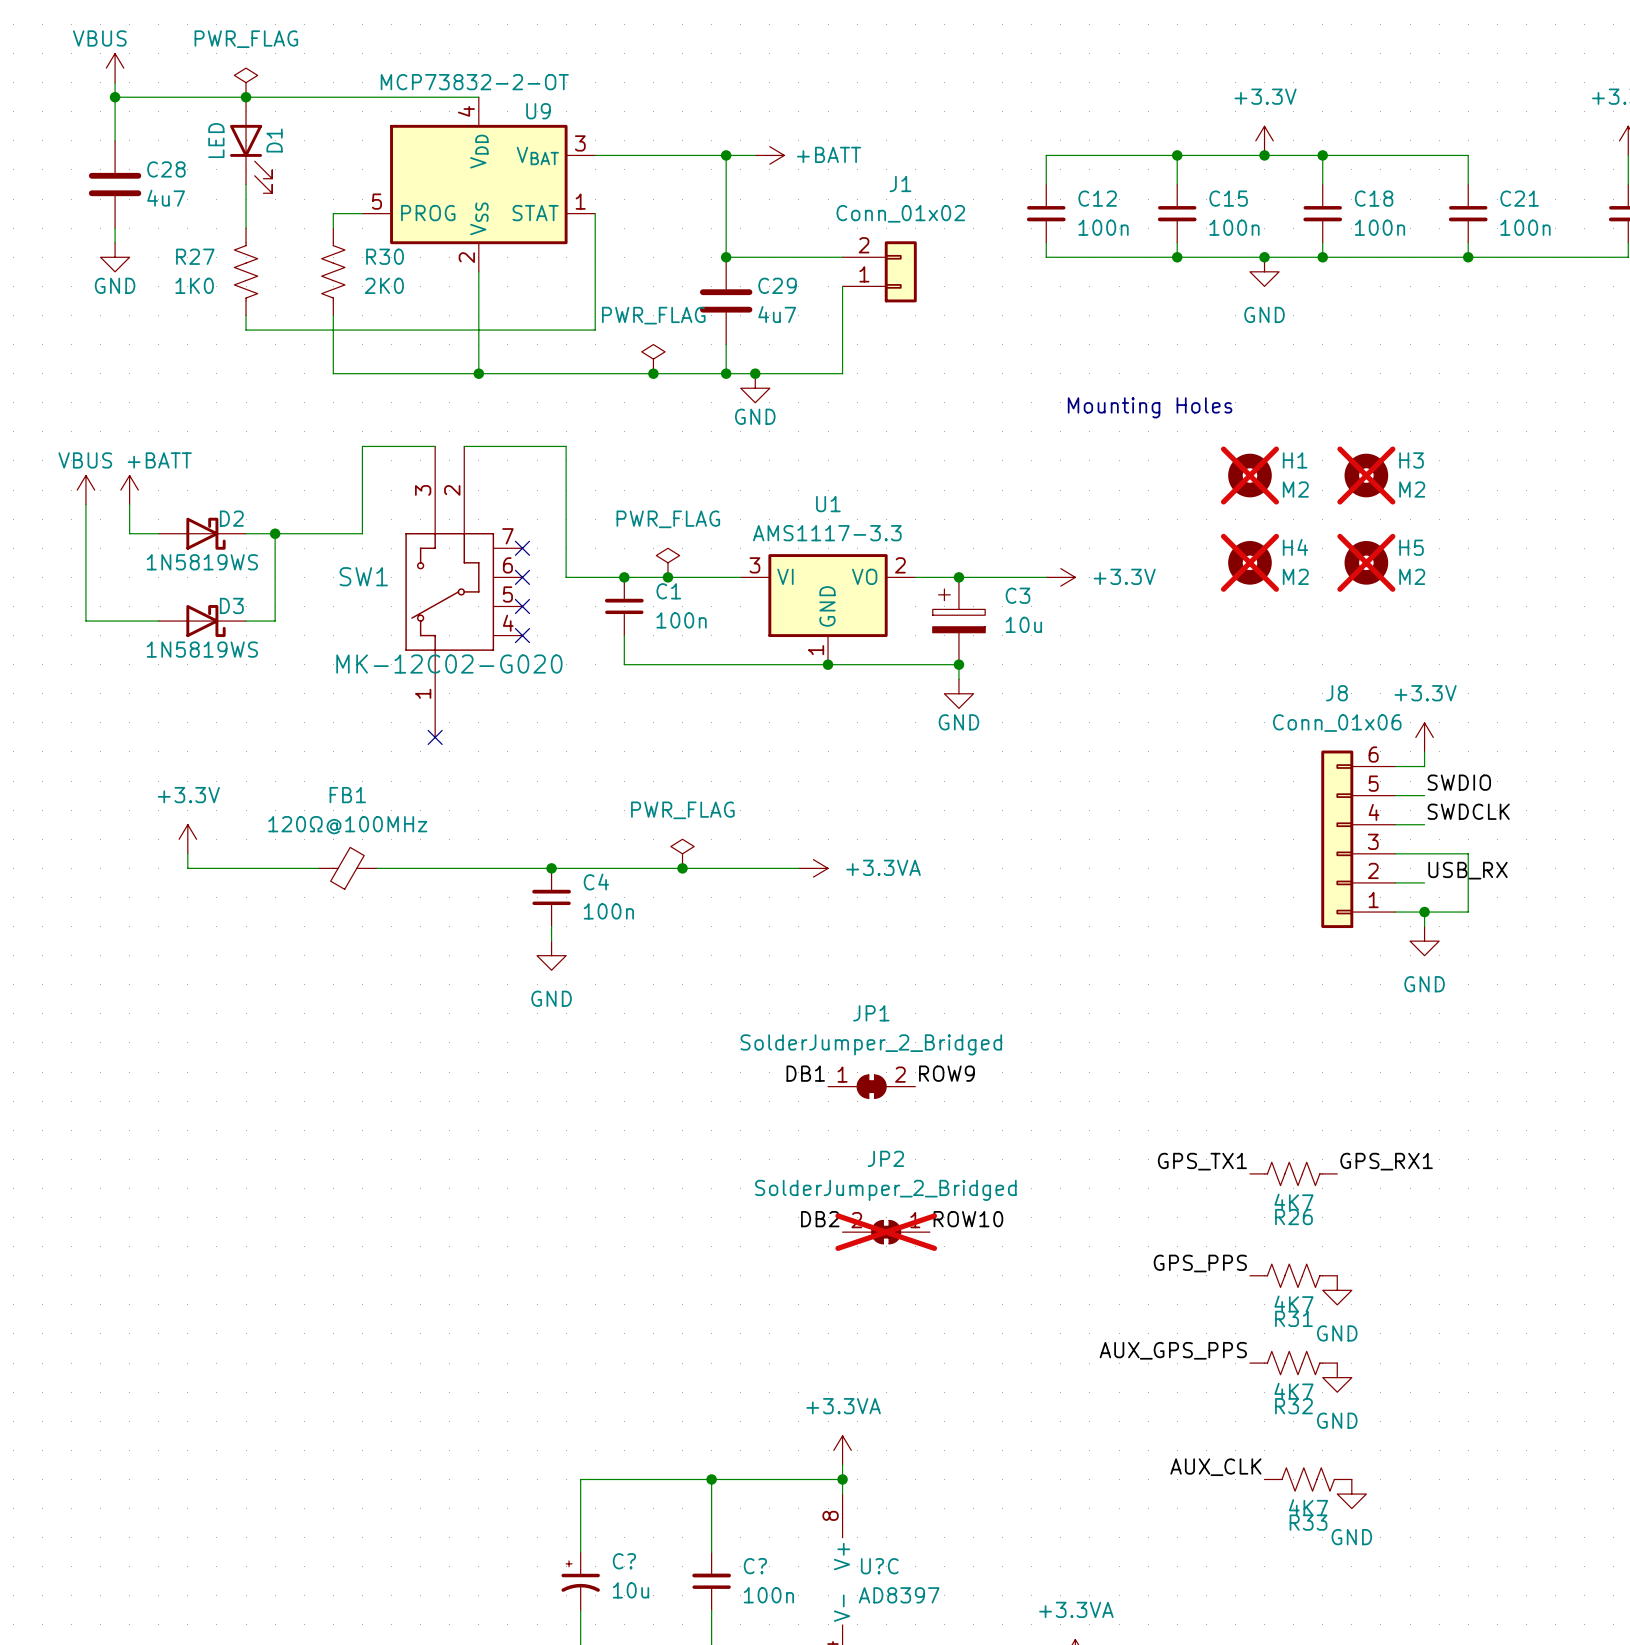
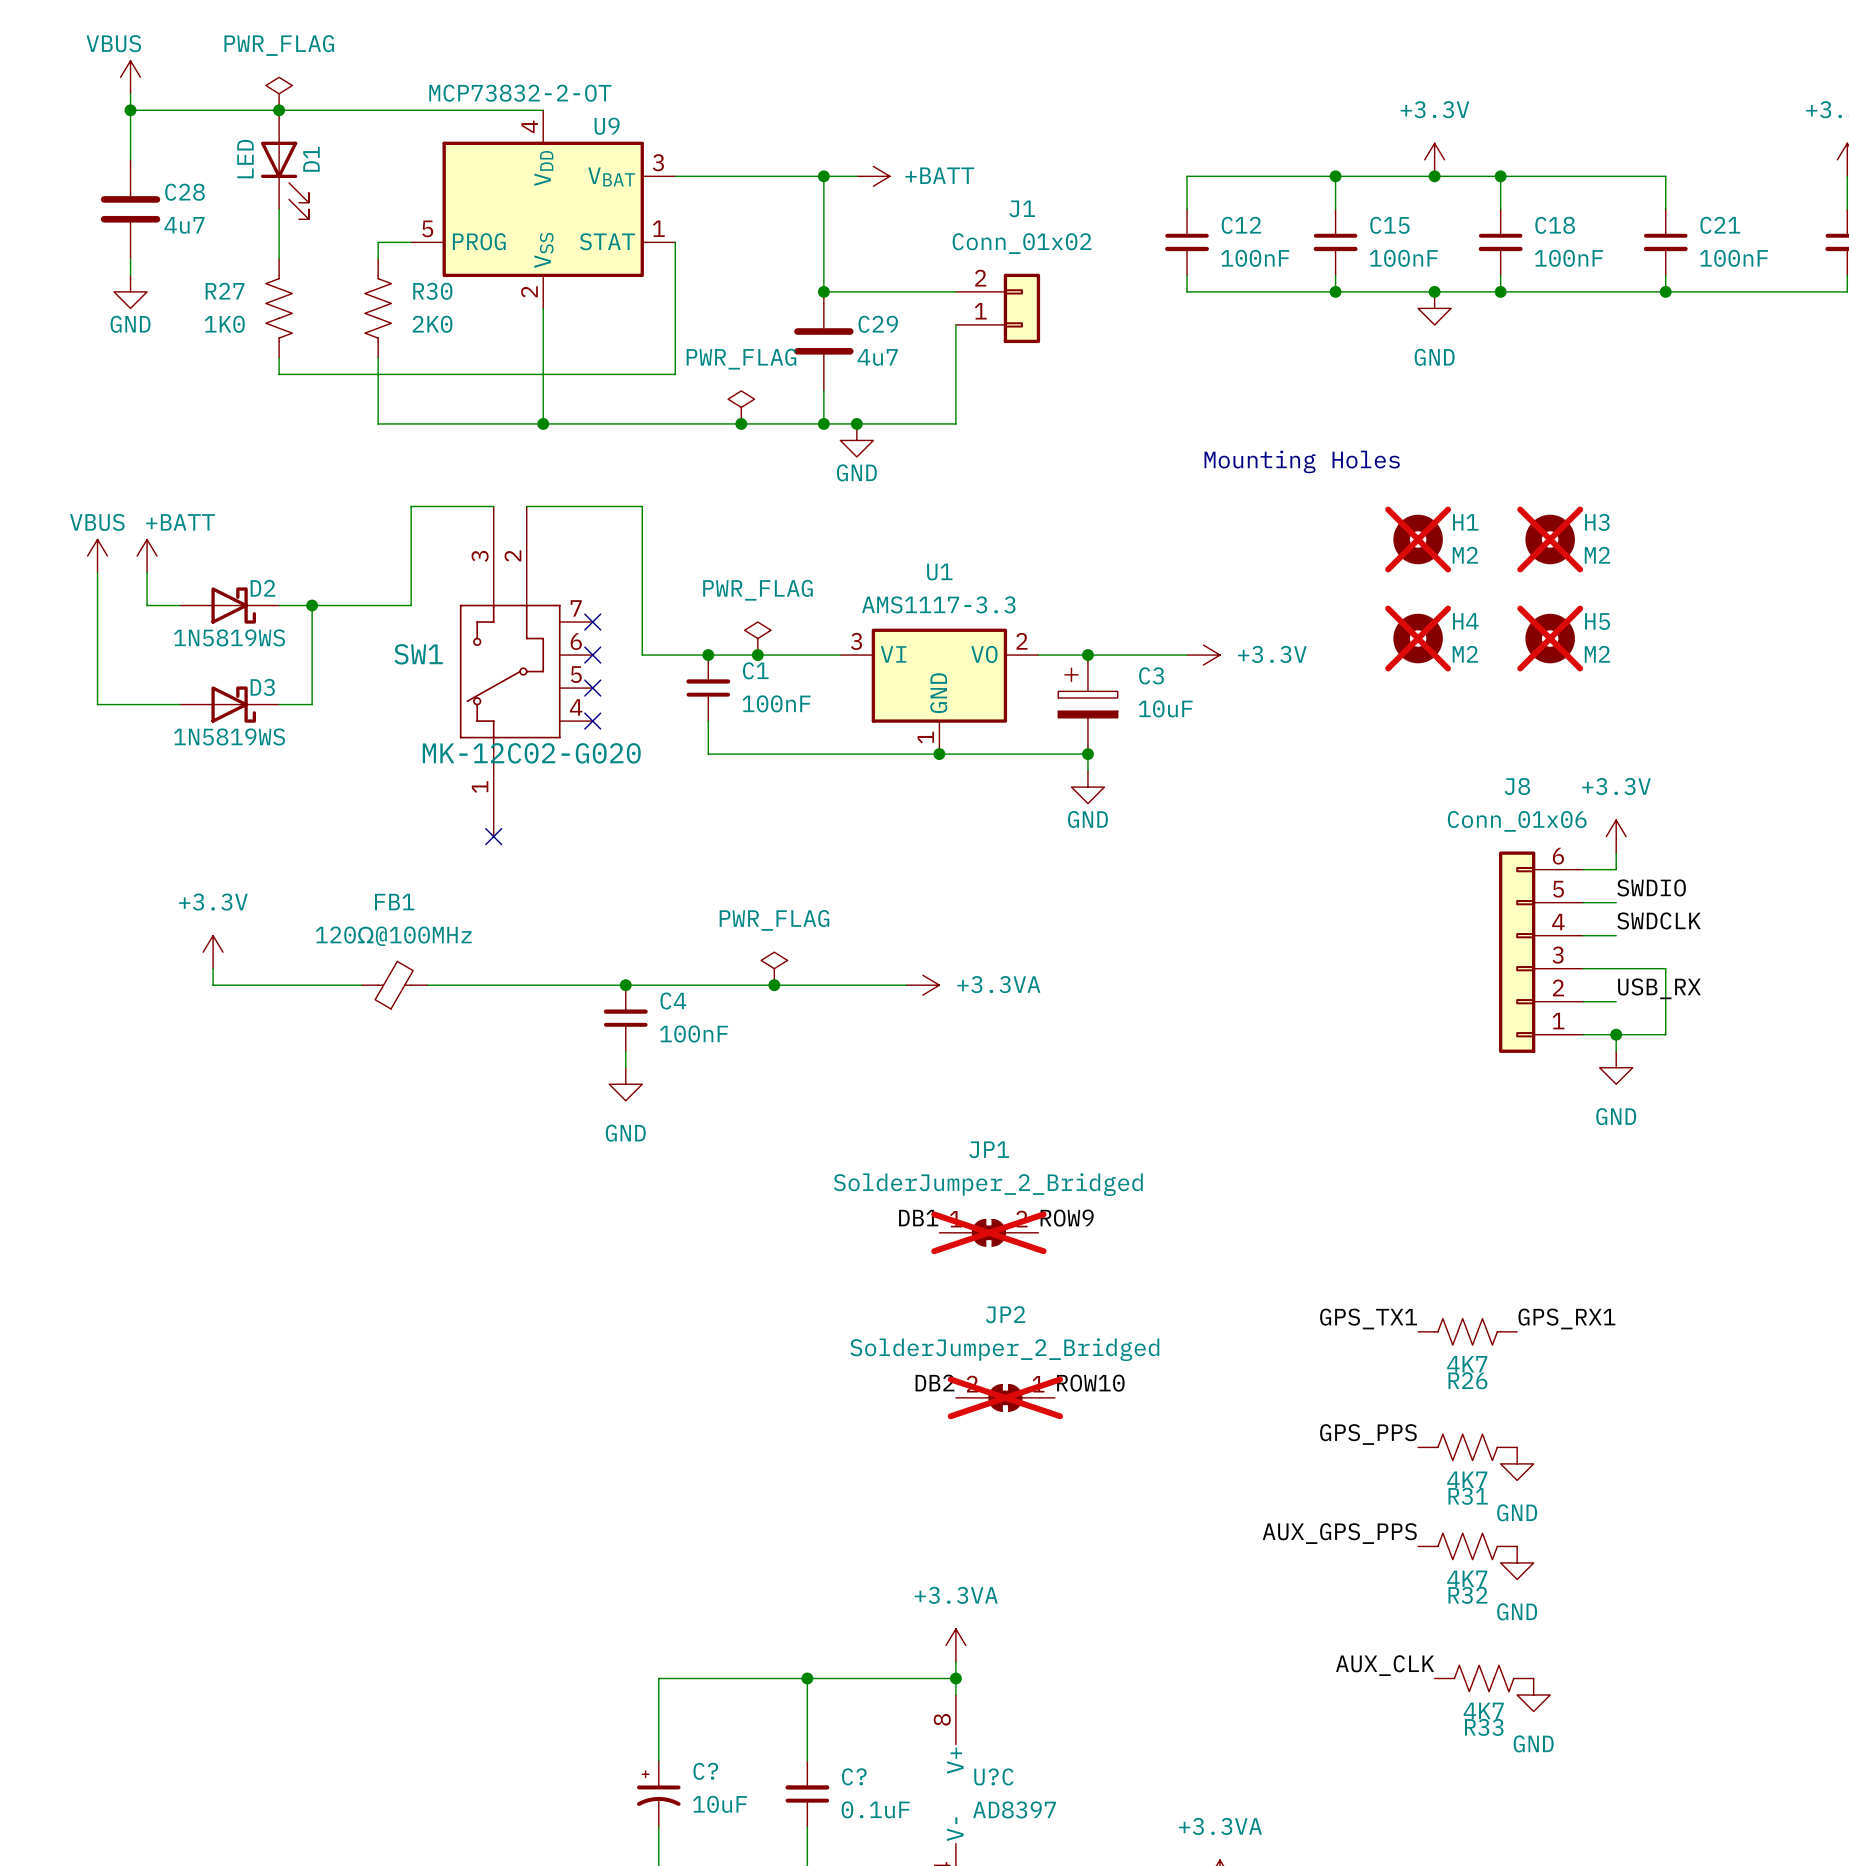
C12 value: 100n (1103, 227) -> 100nF (1255, 258)
C15 value: 100n (1234, 227) -> 100nF (1403, 258)
C18 value: 100n (1379, 227) -> 100nF (1568, 258)
C21 value: 100n (1525, 227) -> 100nF (1734, 258)
C1 value: 100n (681, 620) -> 100nF (776, 703)
C3 value: 10u (1023, 624) -> 10uF (1165, 708)
C4 value: 100n (608, 911) -> 100nF (694, 1034)
JP1 do-not-place cross: none -> (988, 1232)
C? value: 10u (631, 1590) -> 10uF (719, 1804)
C? value: 100n (768, 1595) -> 0.1uF (875, 1809)

